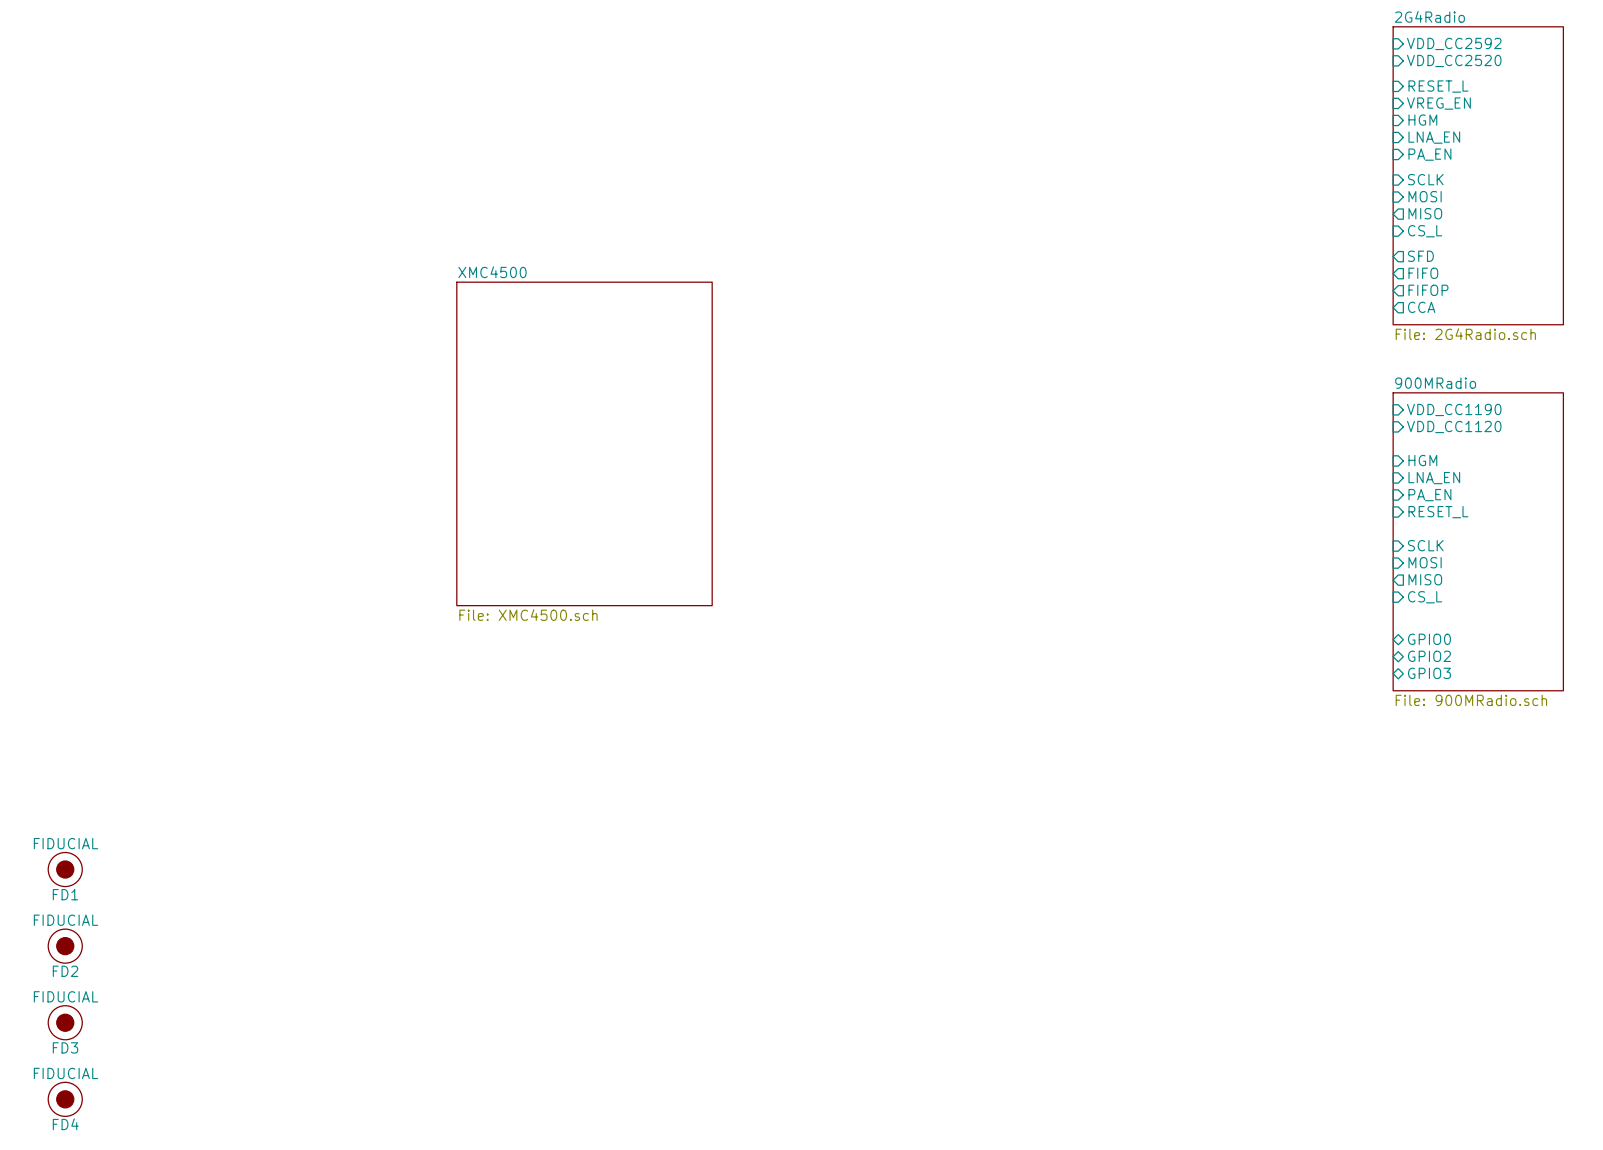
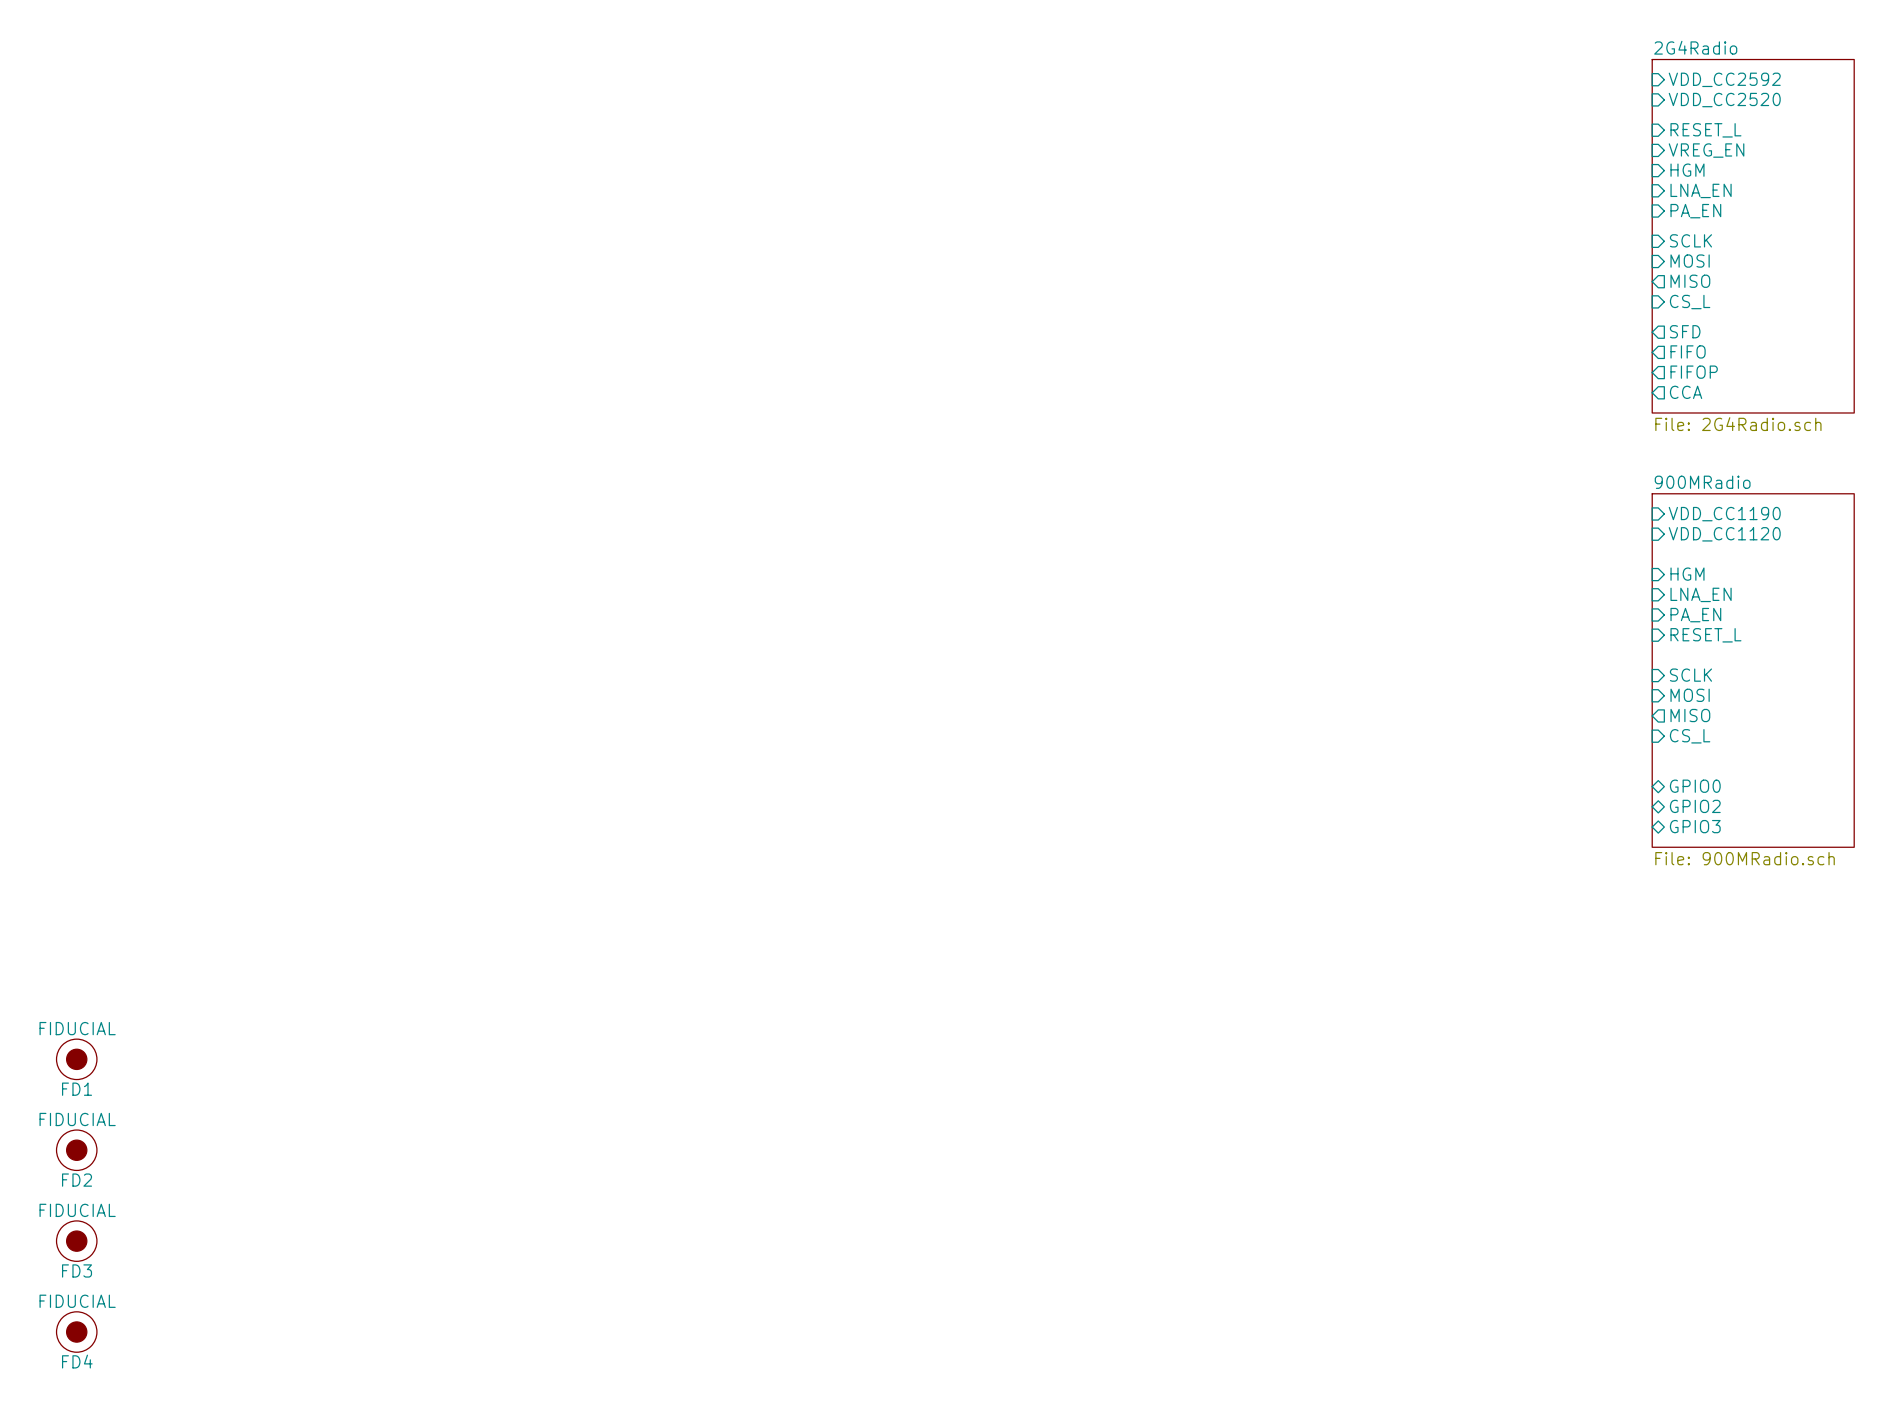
sheet XMC4500: File: XMC4500.sch (584, 443) -> none

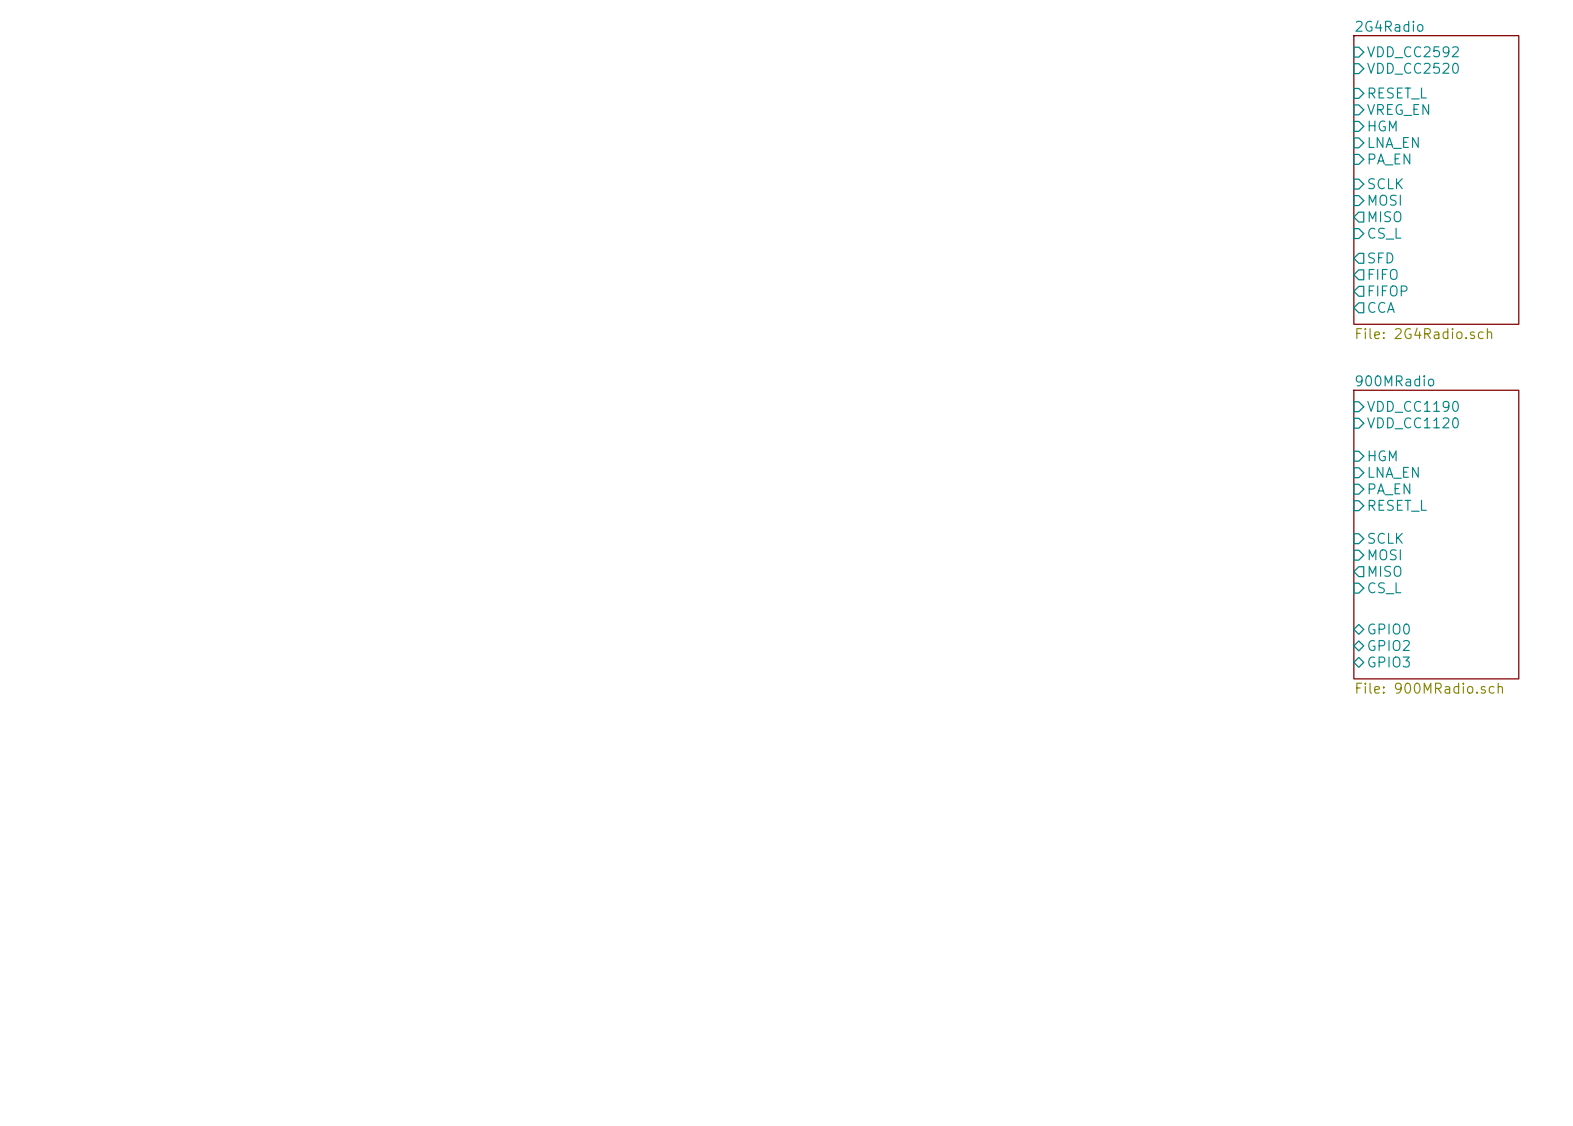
FD1: FIDUCIAL (76, 1059) -> none
FD2: FIDUCIAL (76, 1150) -> none
FD3: FIDUCIAL (76, 1241) -> none
FD4: FIDUCIAL (76, 1332) -> none

